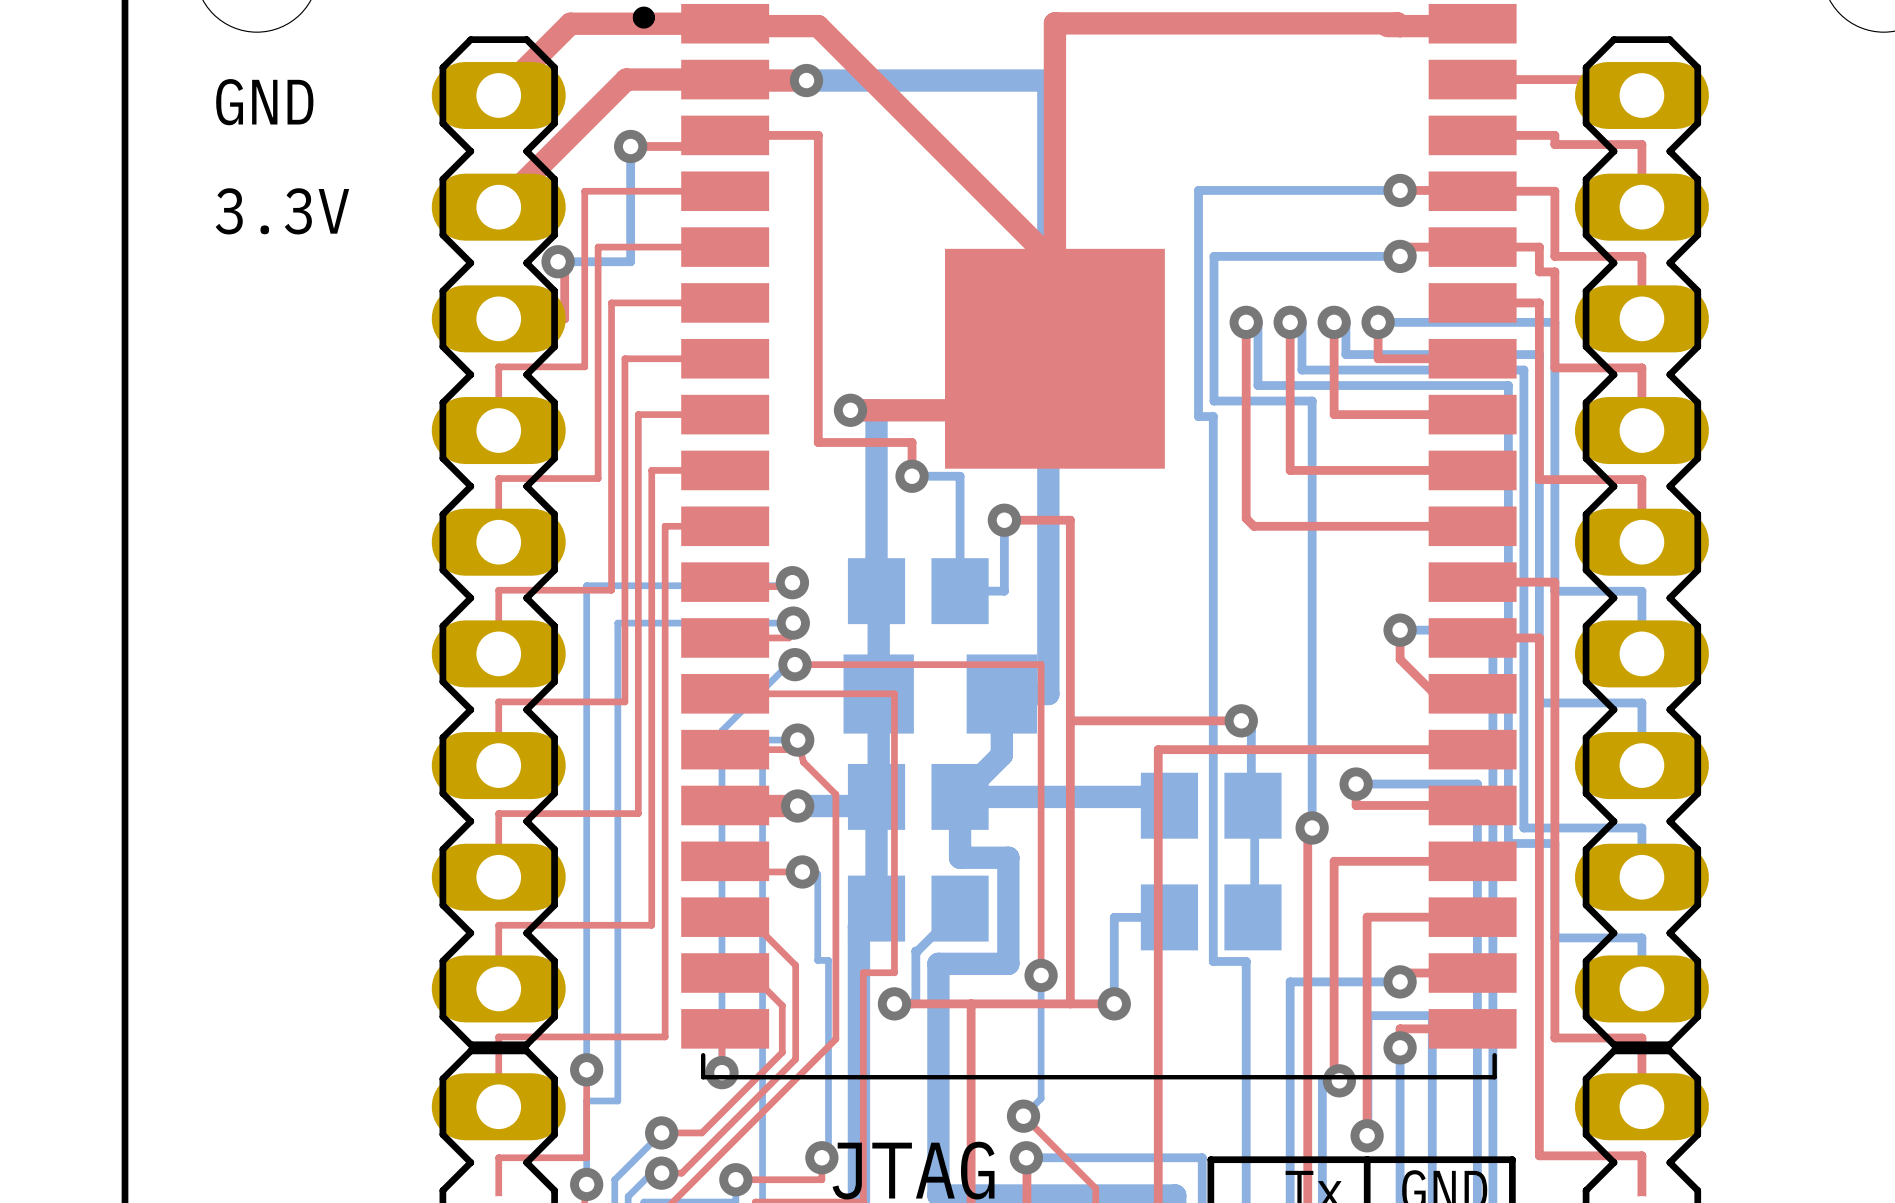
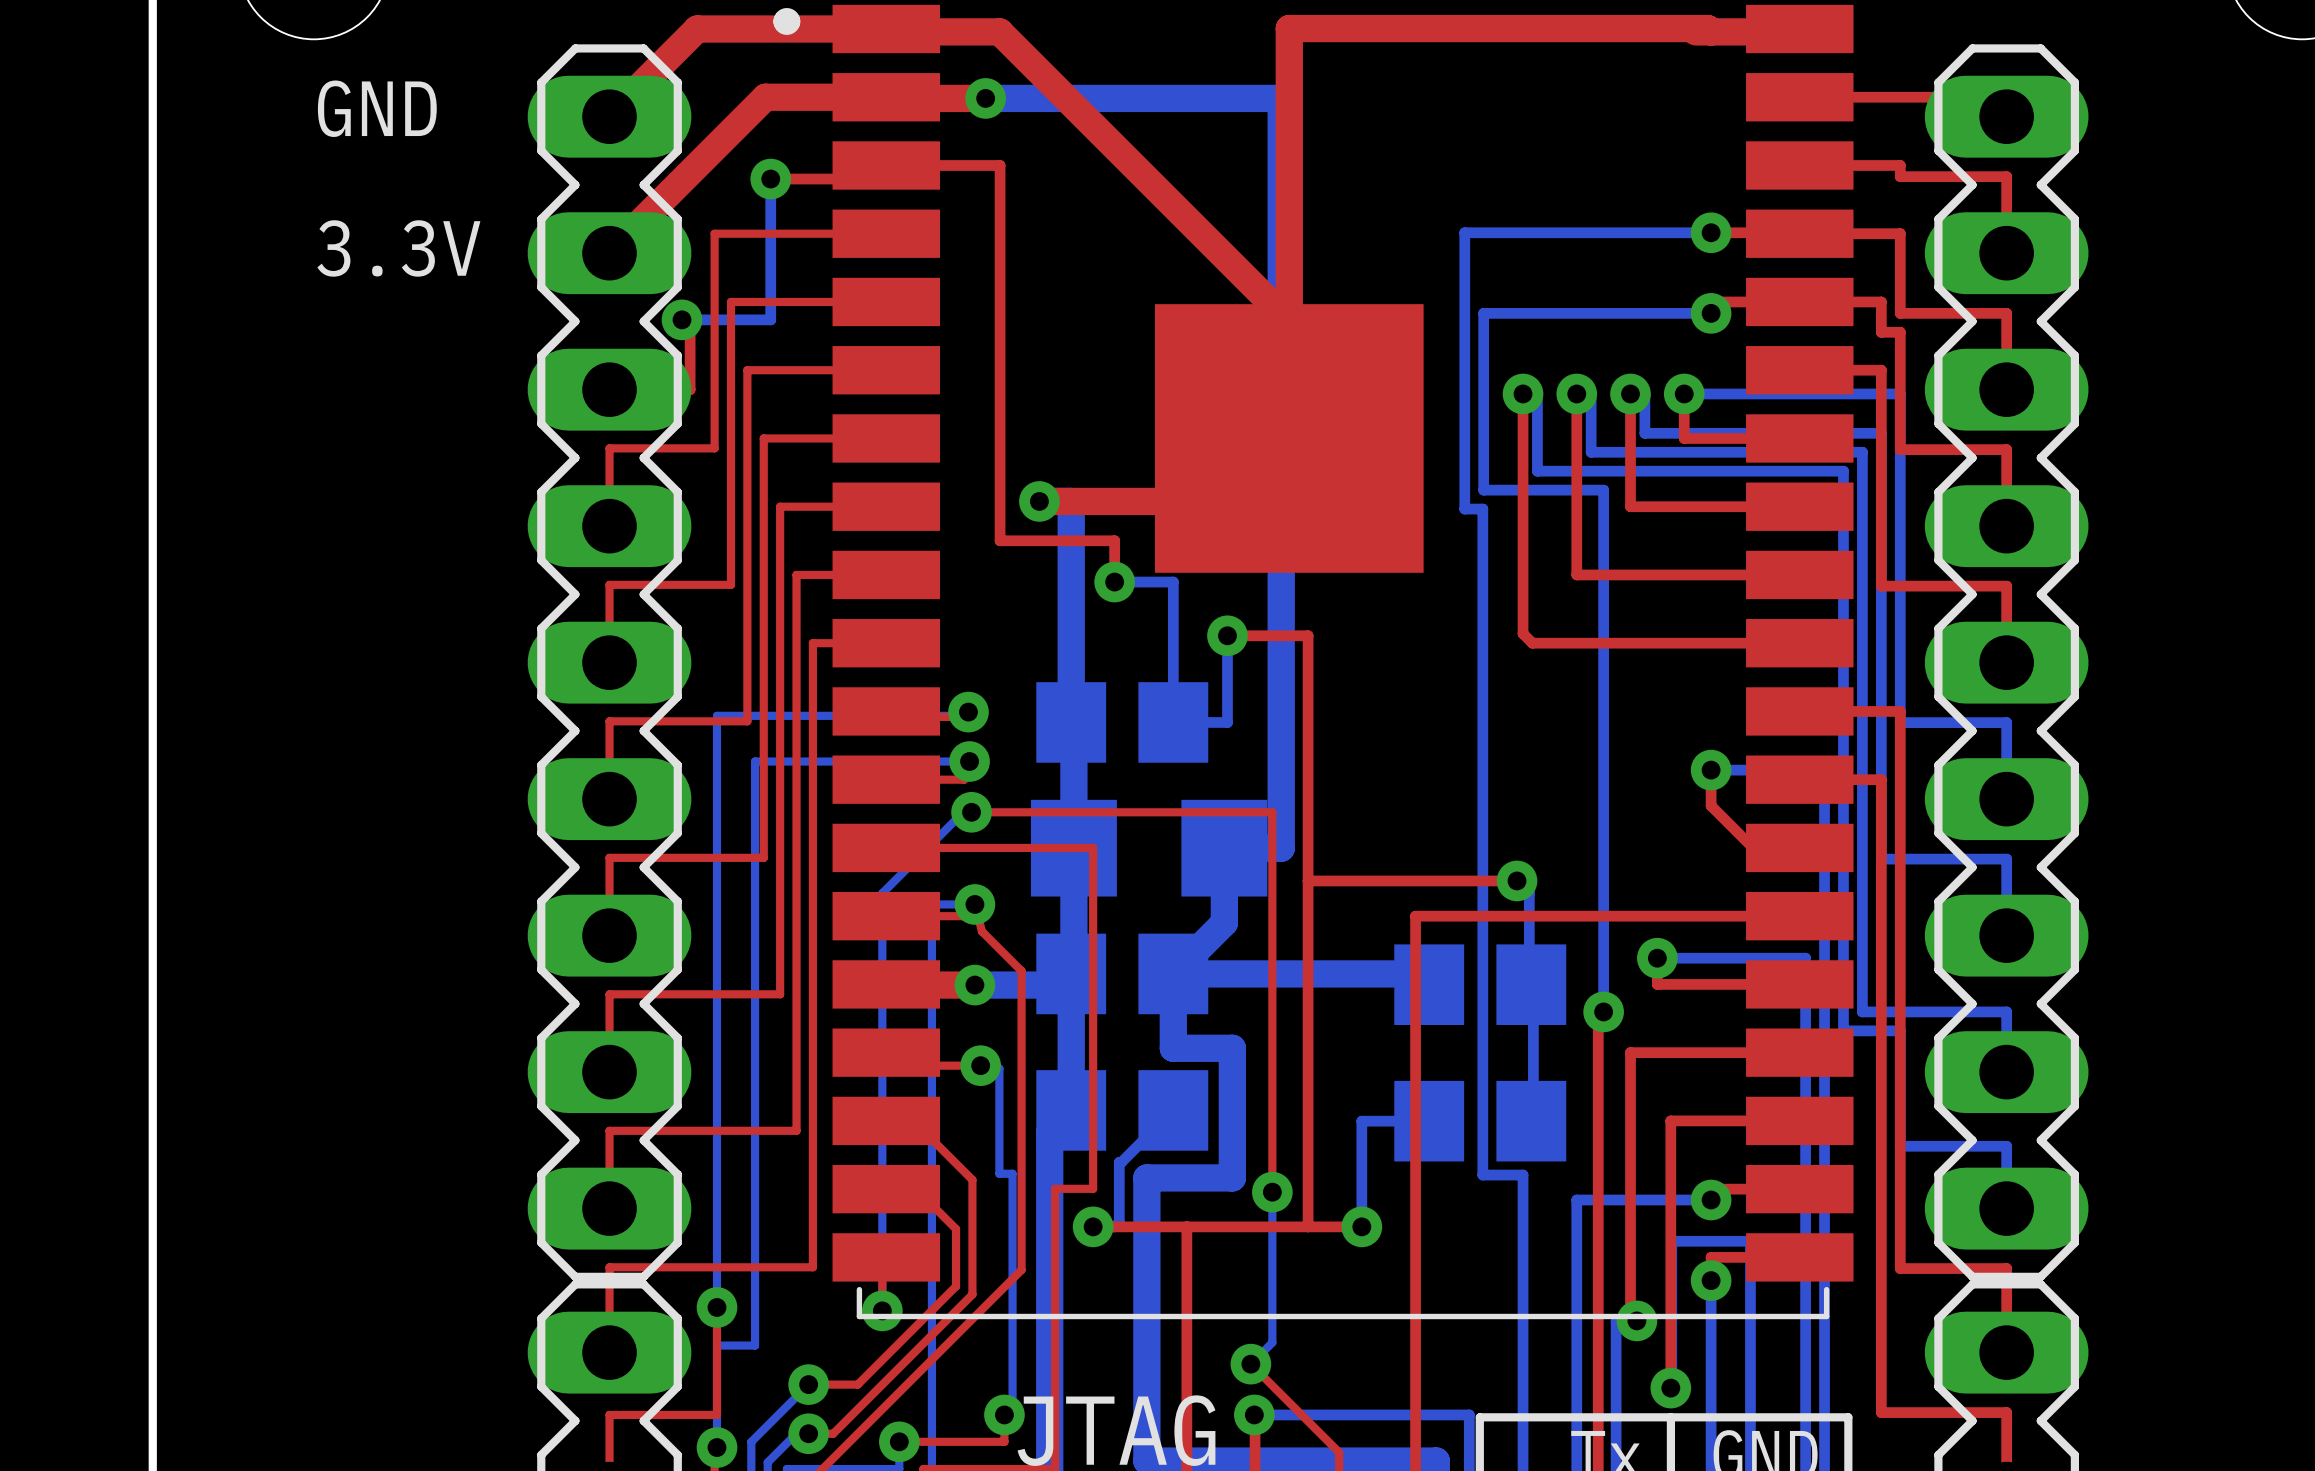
text position: GND (264, 102) -> GND (377, 108)
text position: 3.3V (282, 211) -> 3.3V (398, 248)

